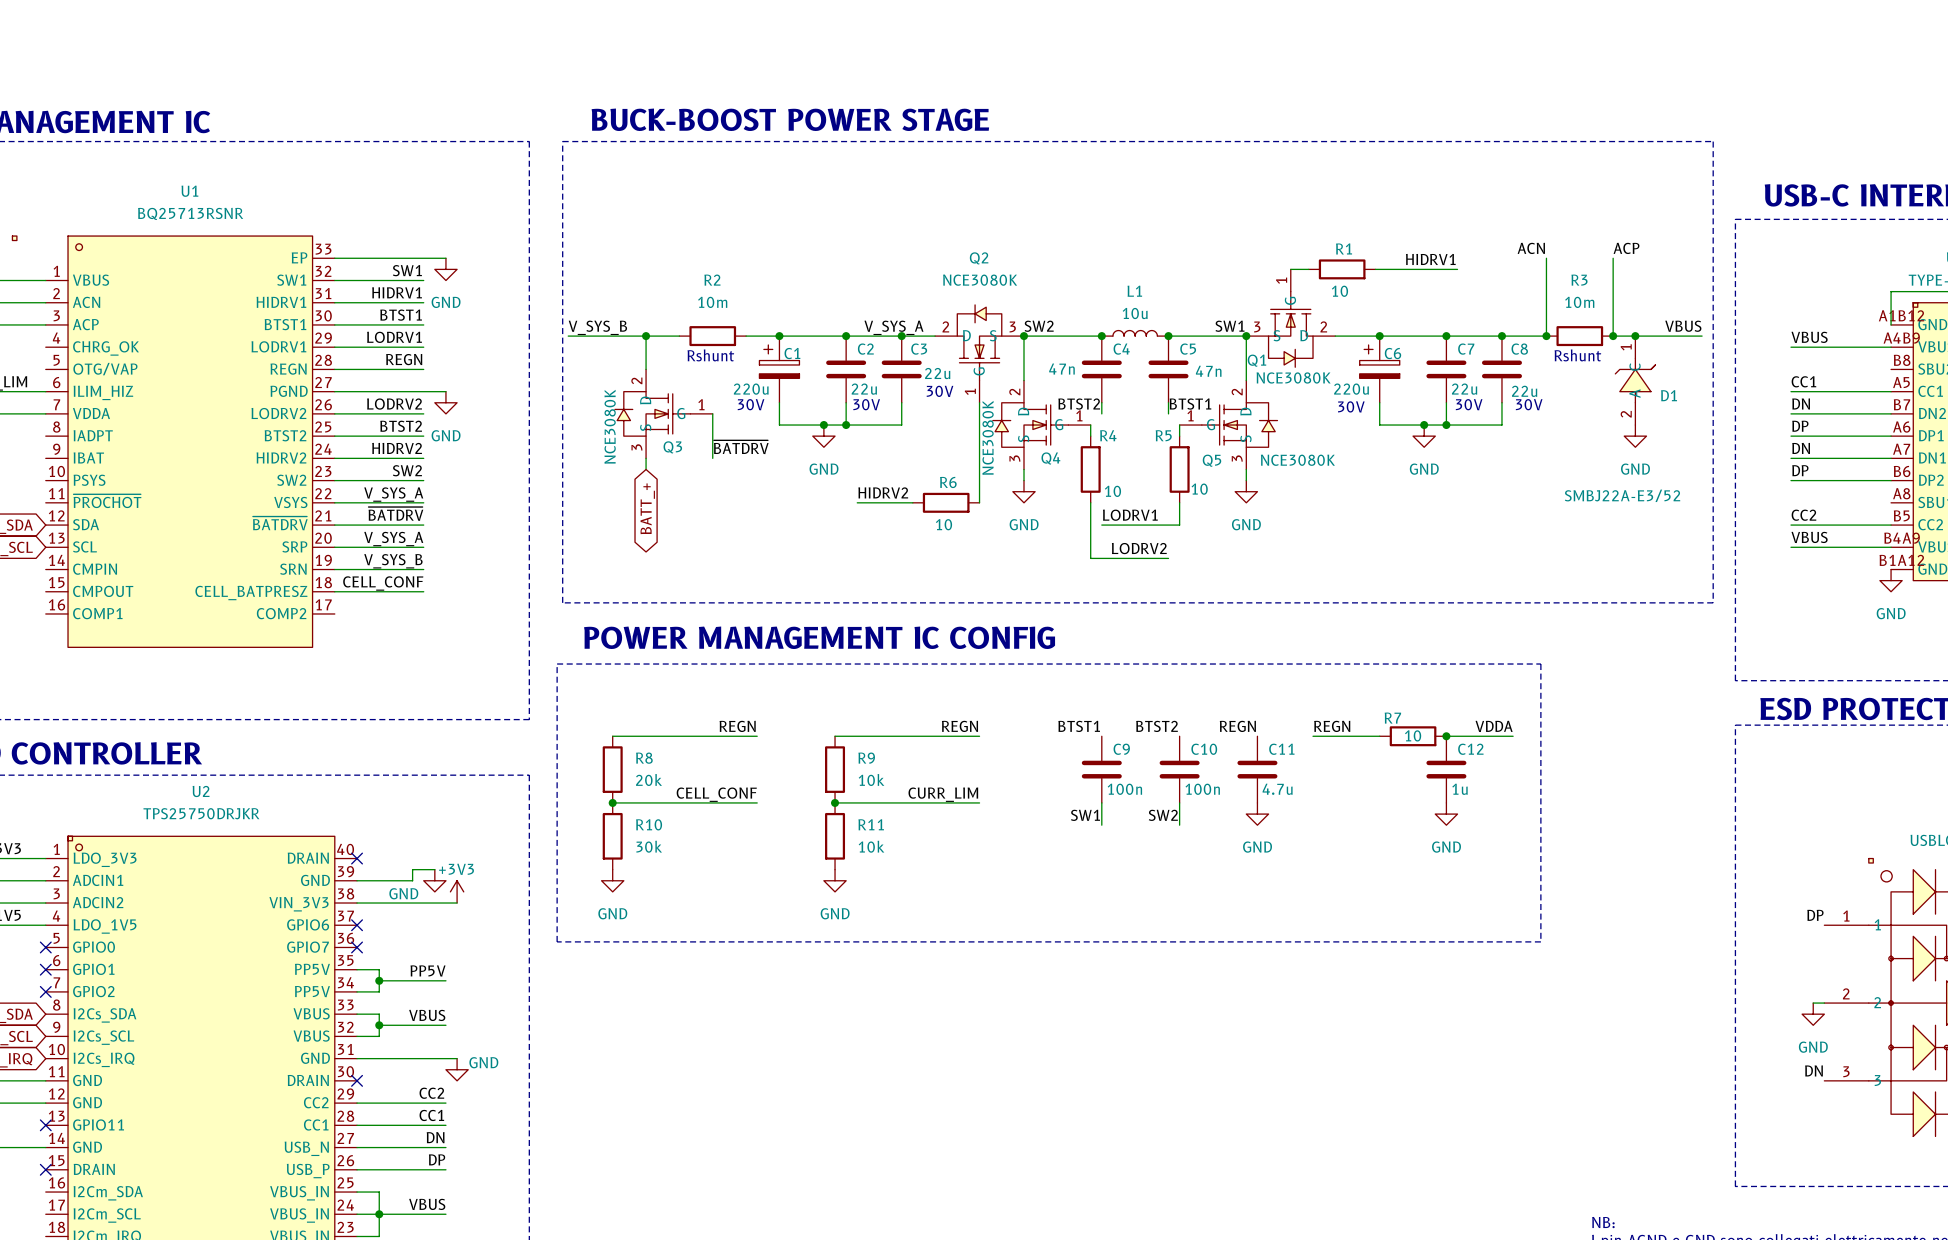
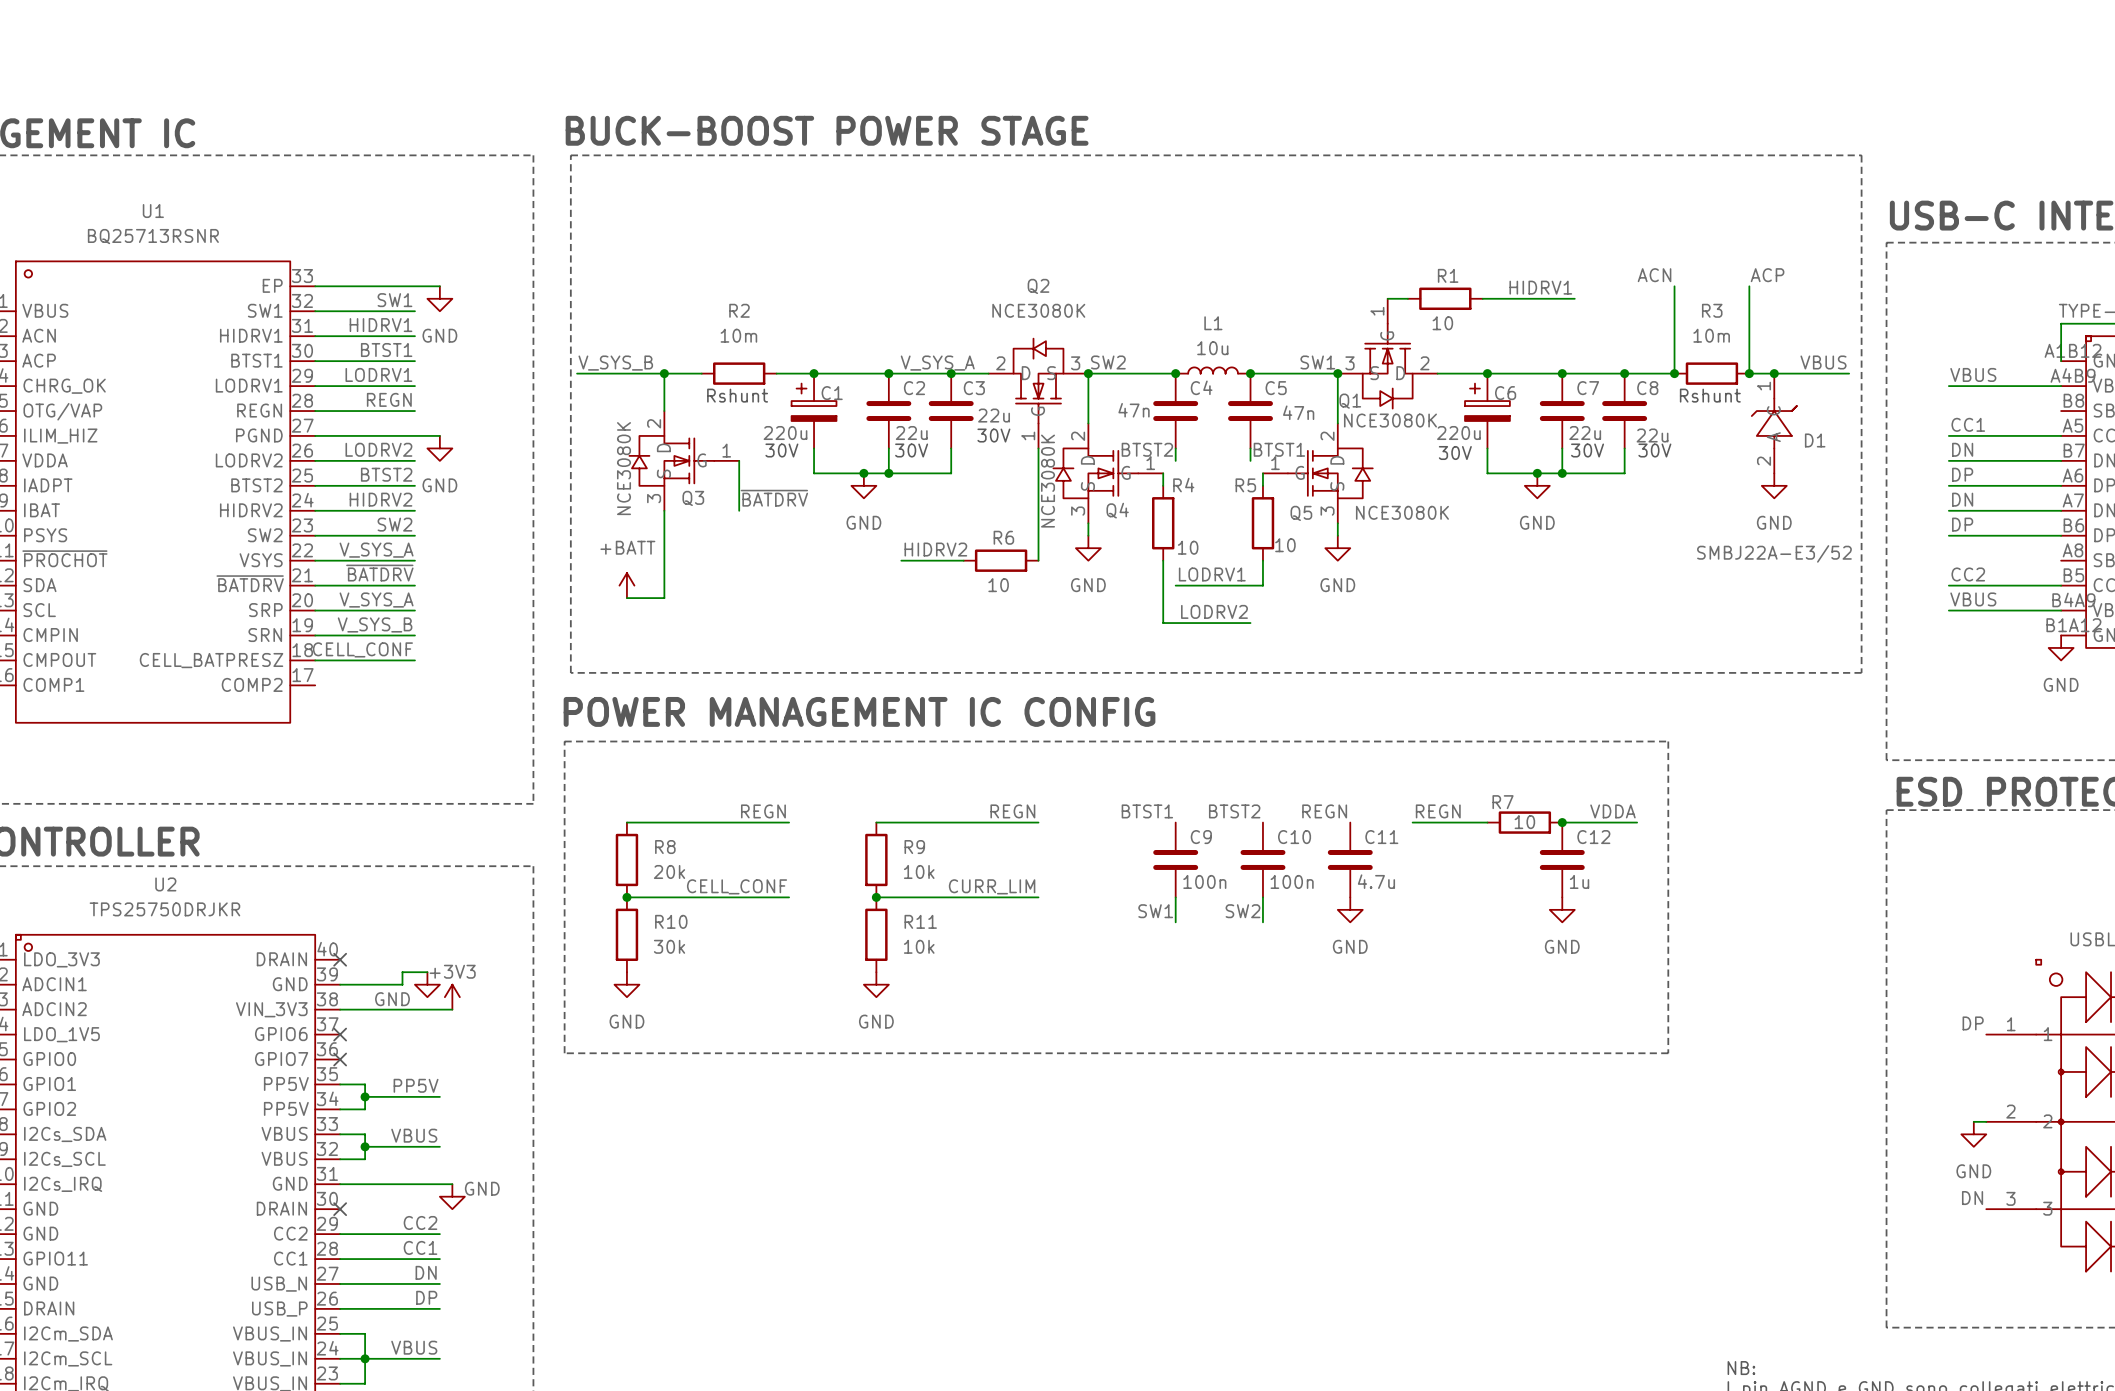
wire: none -> (664, 523) (664, 598) (626, 598)
global label: BATT_+ (647, 508) -> none
power symbol: none -> +BATT (626, 585)

